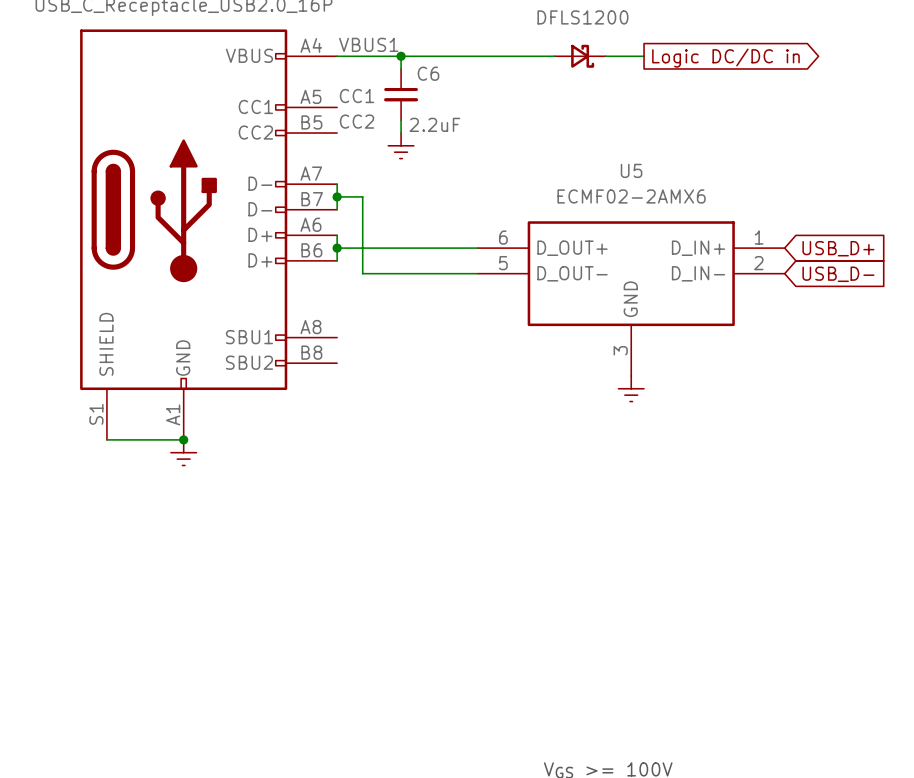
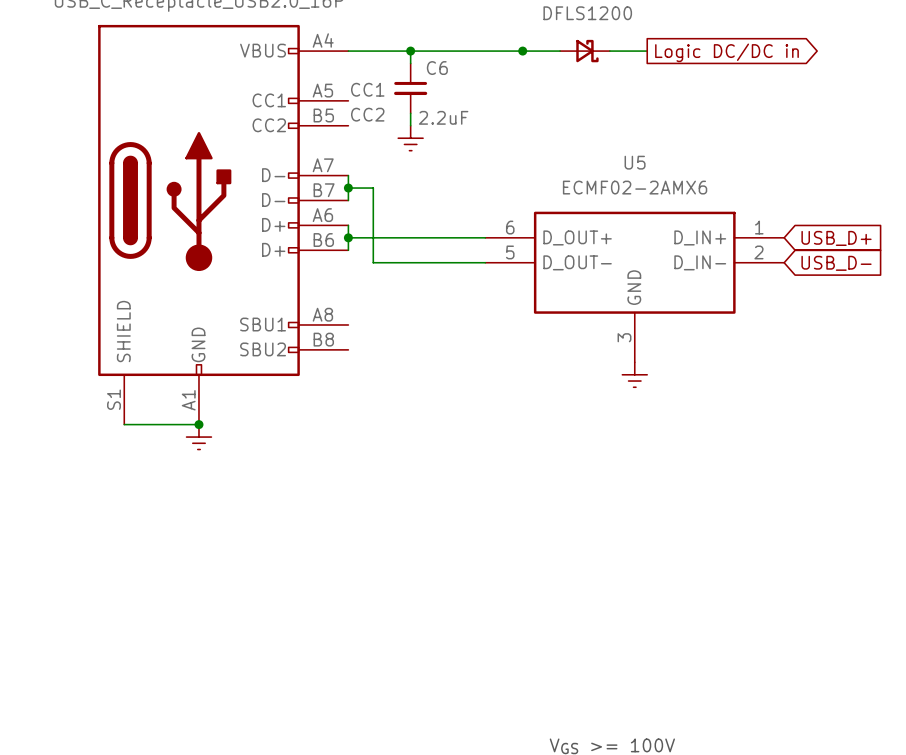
label: VBUS1 (368, 44) -> none
junction: none -> (522, 51)

